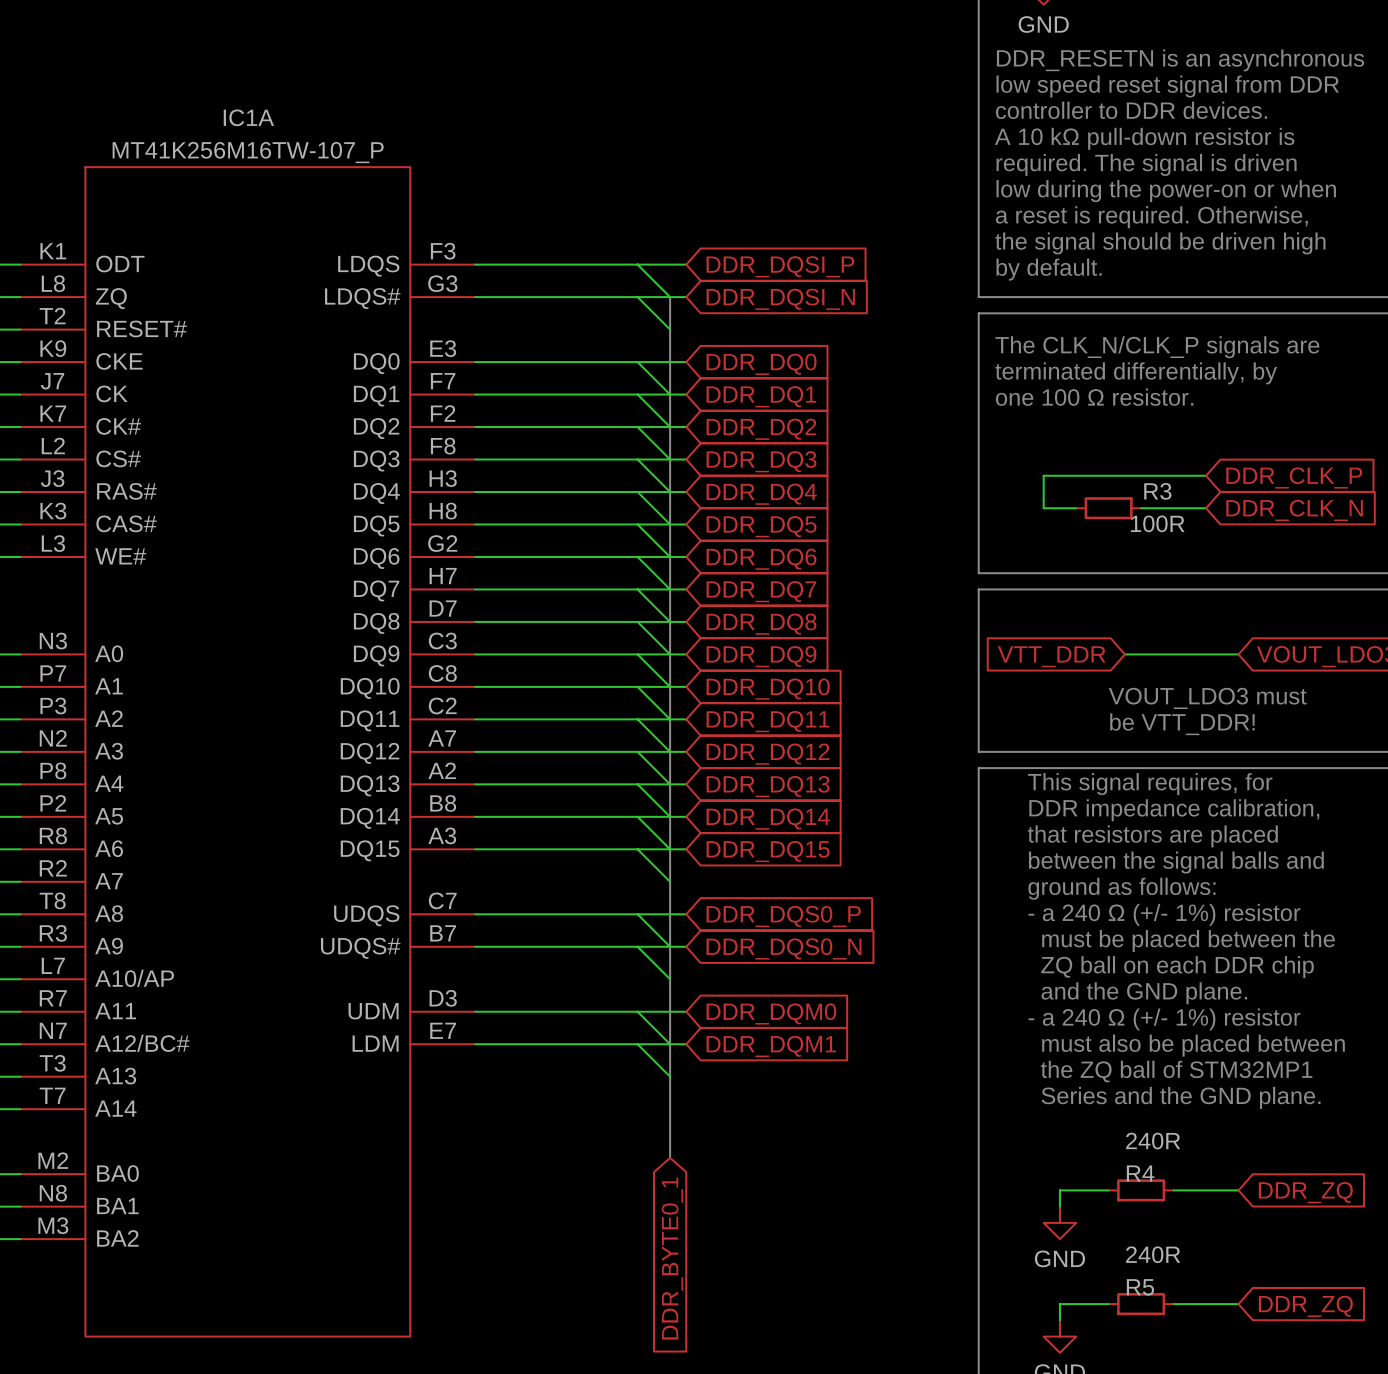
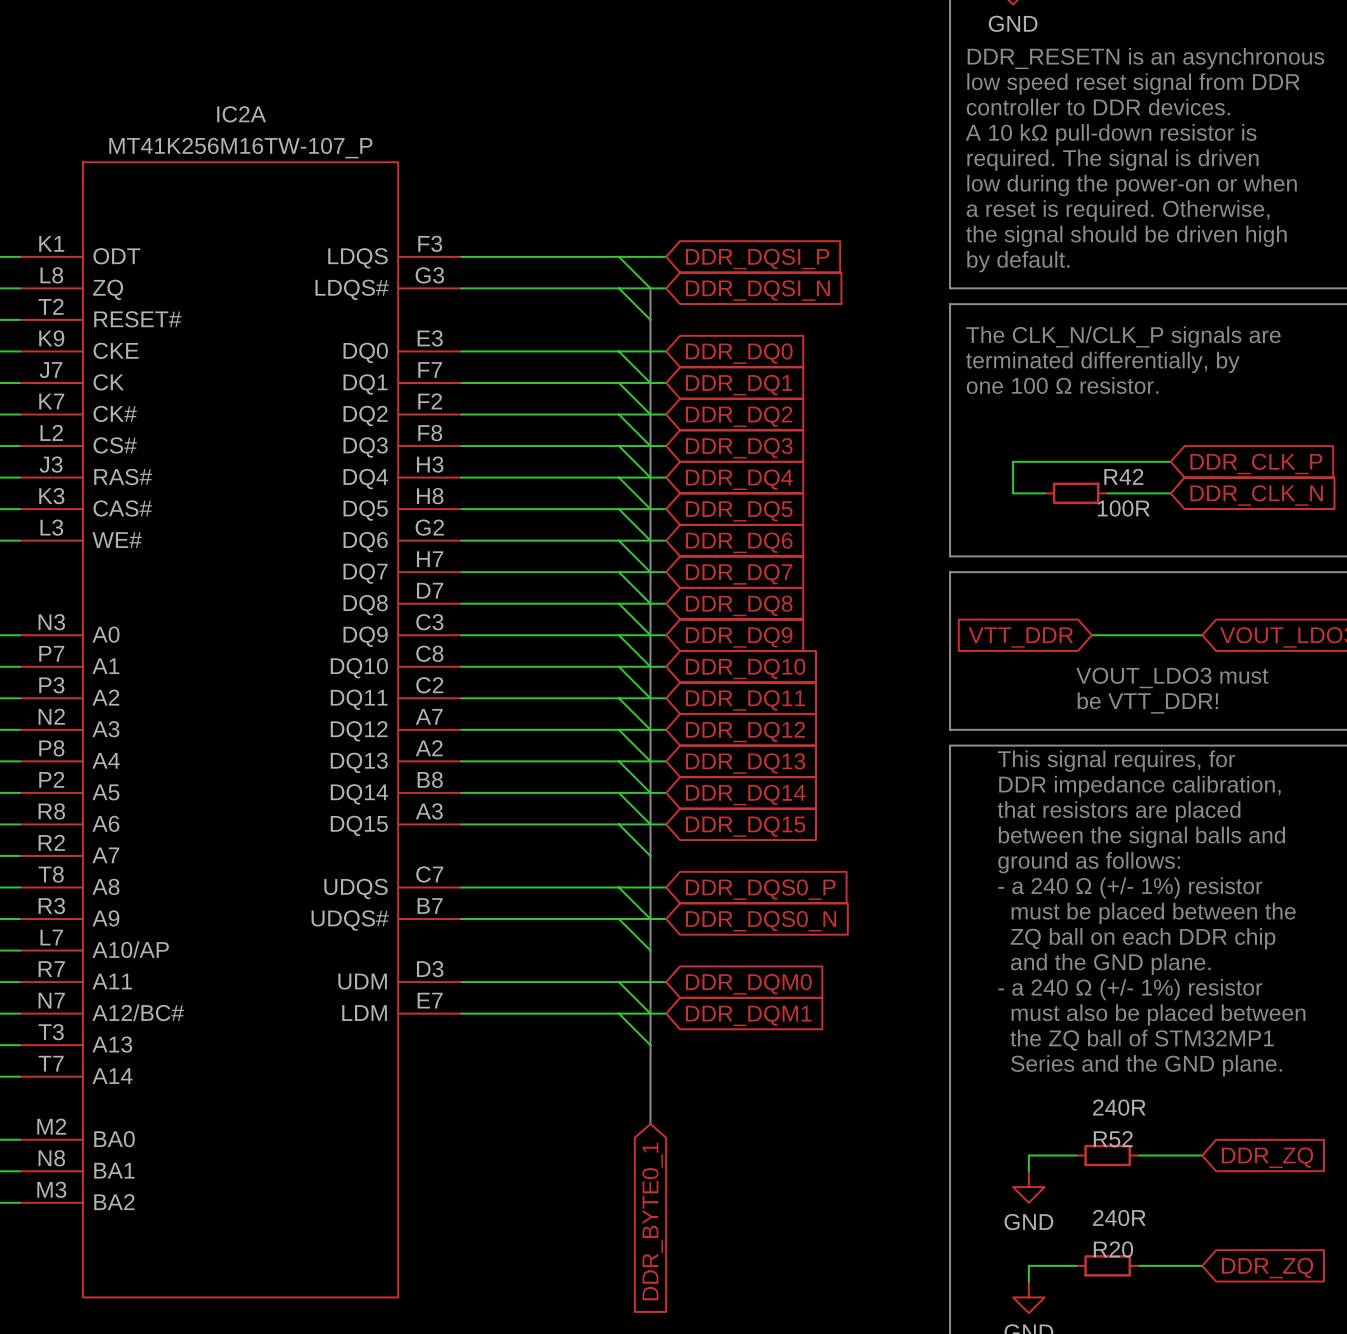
IC1A name: IC1A (248, 117) -> IC2A (241, 114)
R3 name: R3 (1157, 491) -> R42 (1123, 476)
R4 name: R4 (1140, 1173) -> R52 (1113, 1139)
R5 name: R5 (1140, 1287) -> R20 (1113, 1249)

